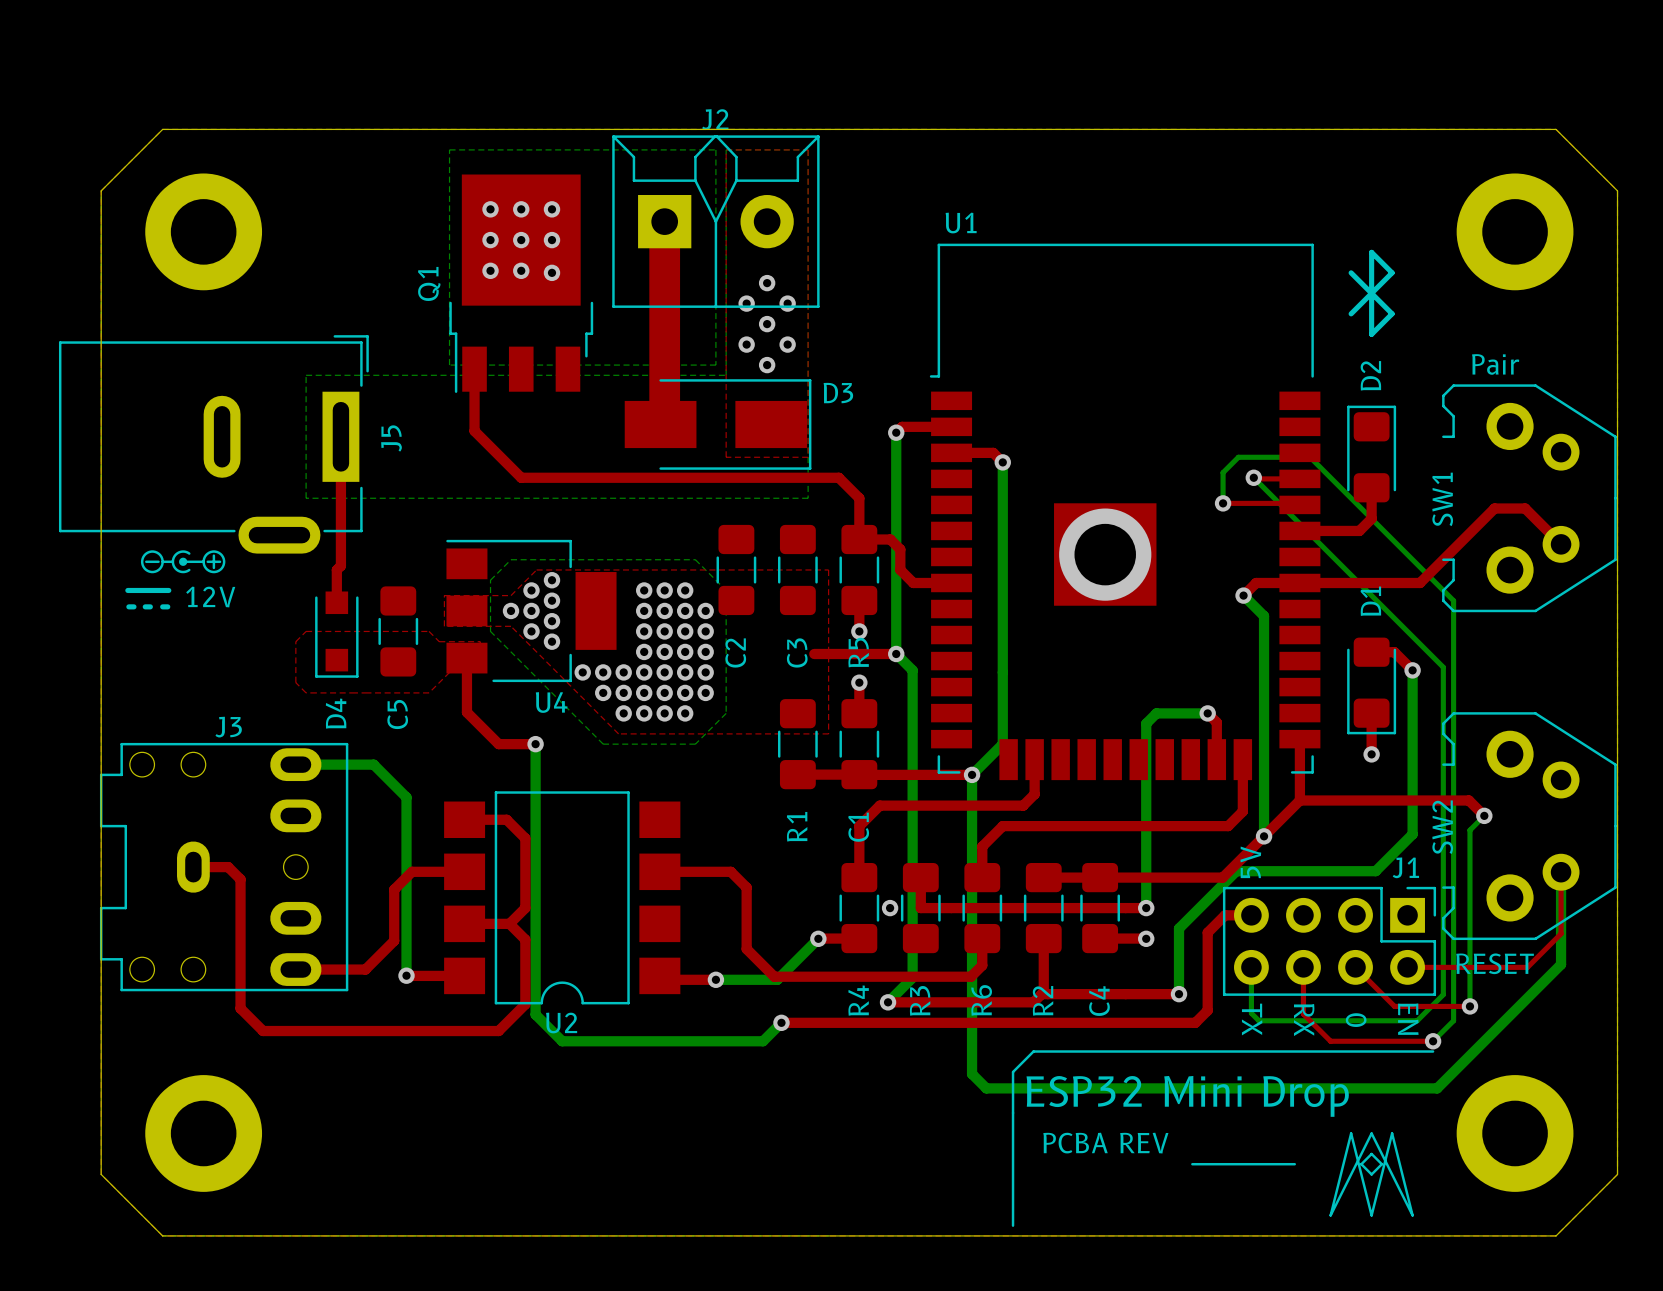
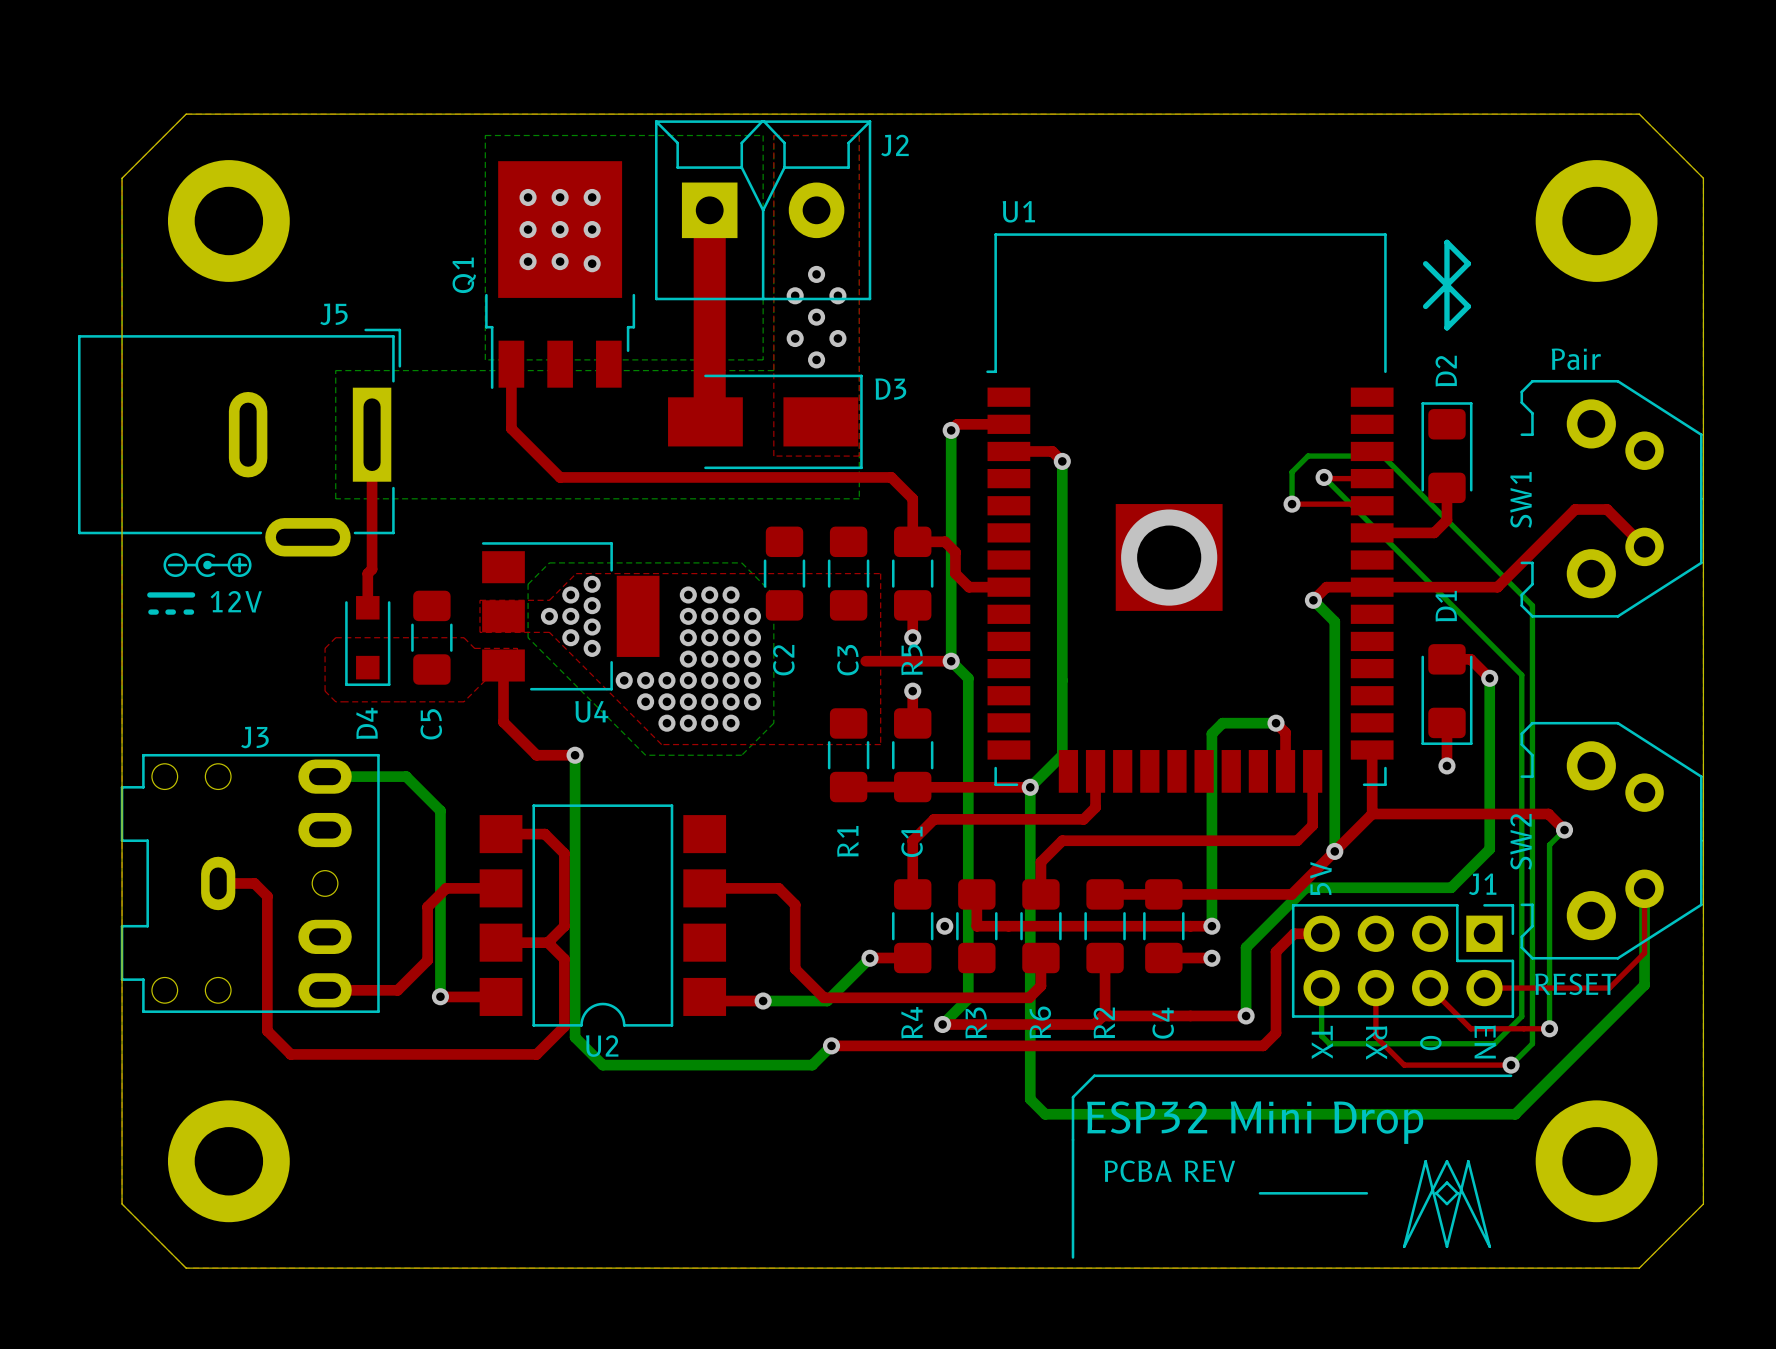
J2 name position: J2 (715, 119) -> J2 (894, 145)
J5 name rotation: 0° (391, 438) -> 90° clockwise (333, 314)
J5 name position: J5 (391, 438) -> J5 (333, 314)

